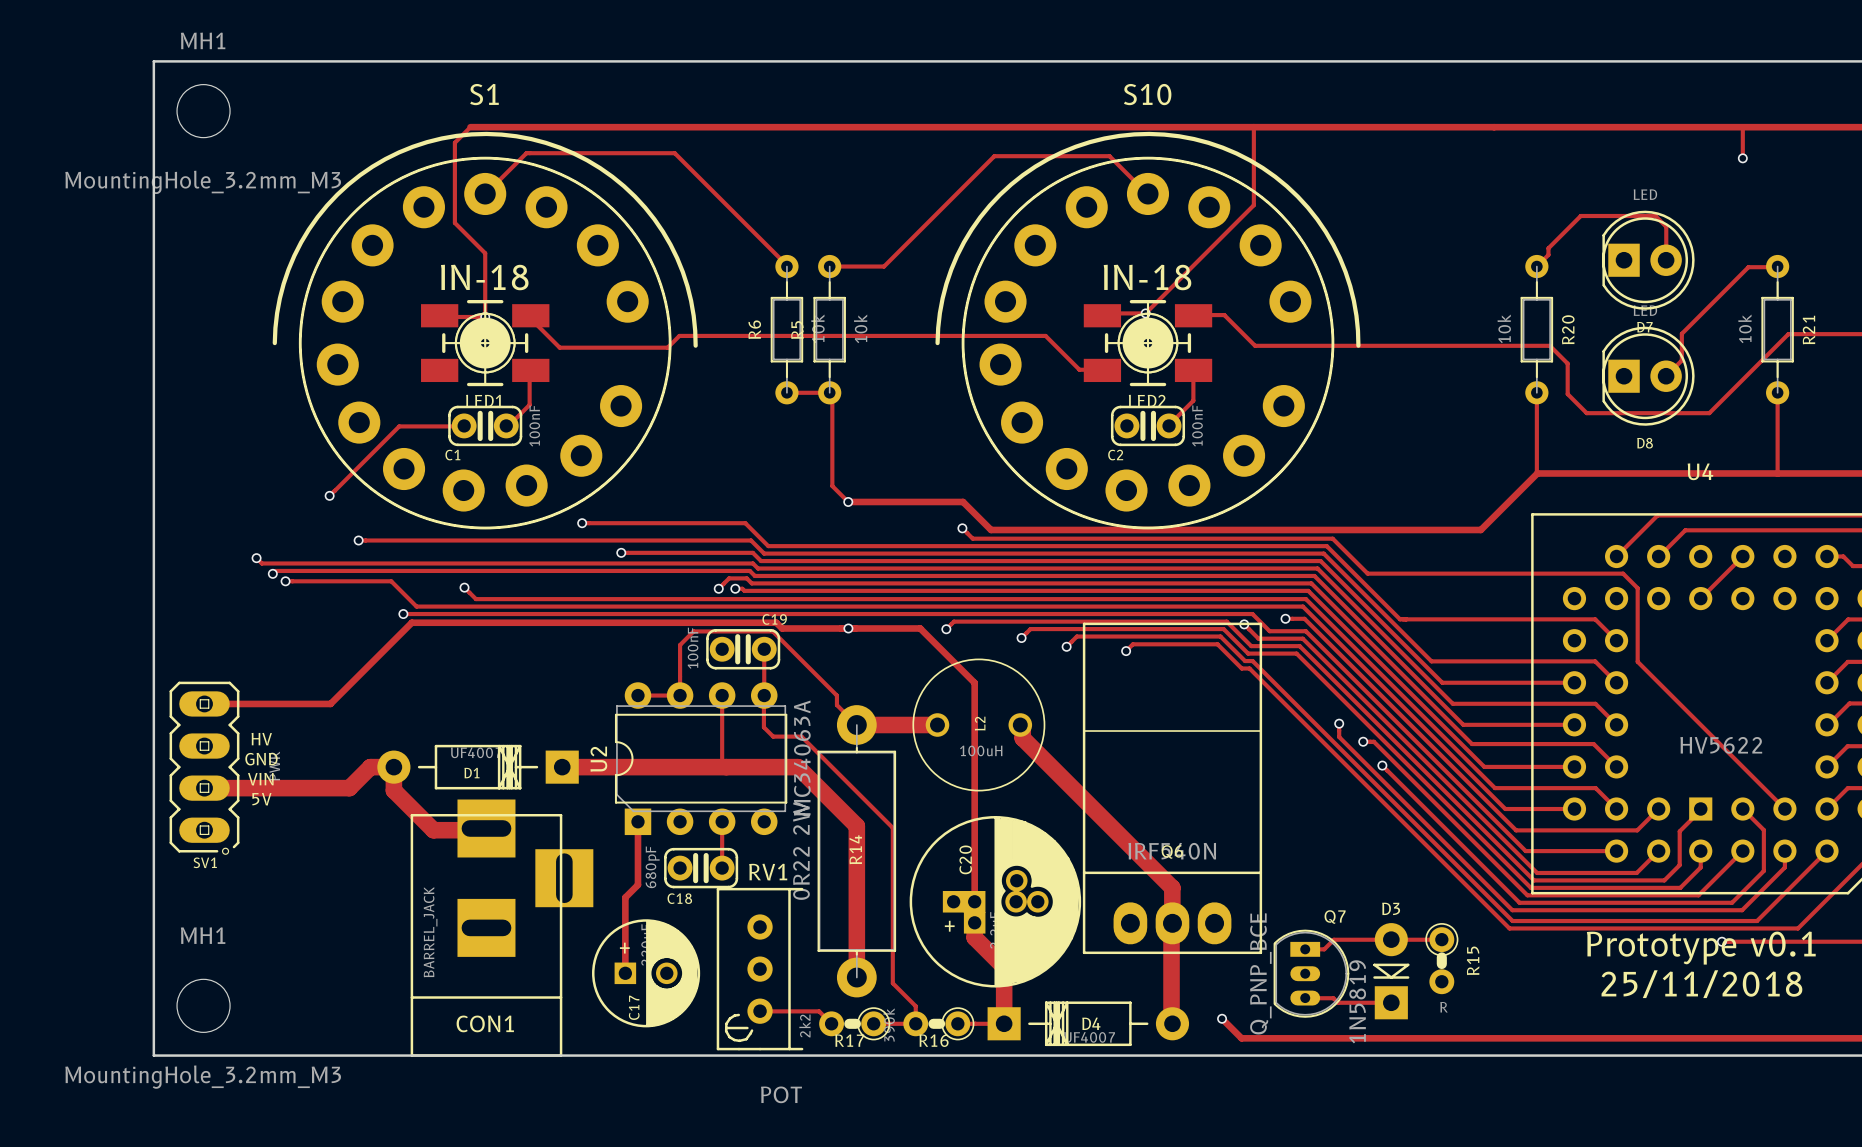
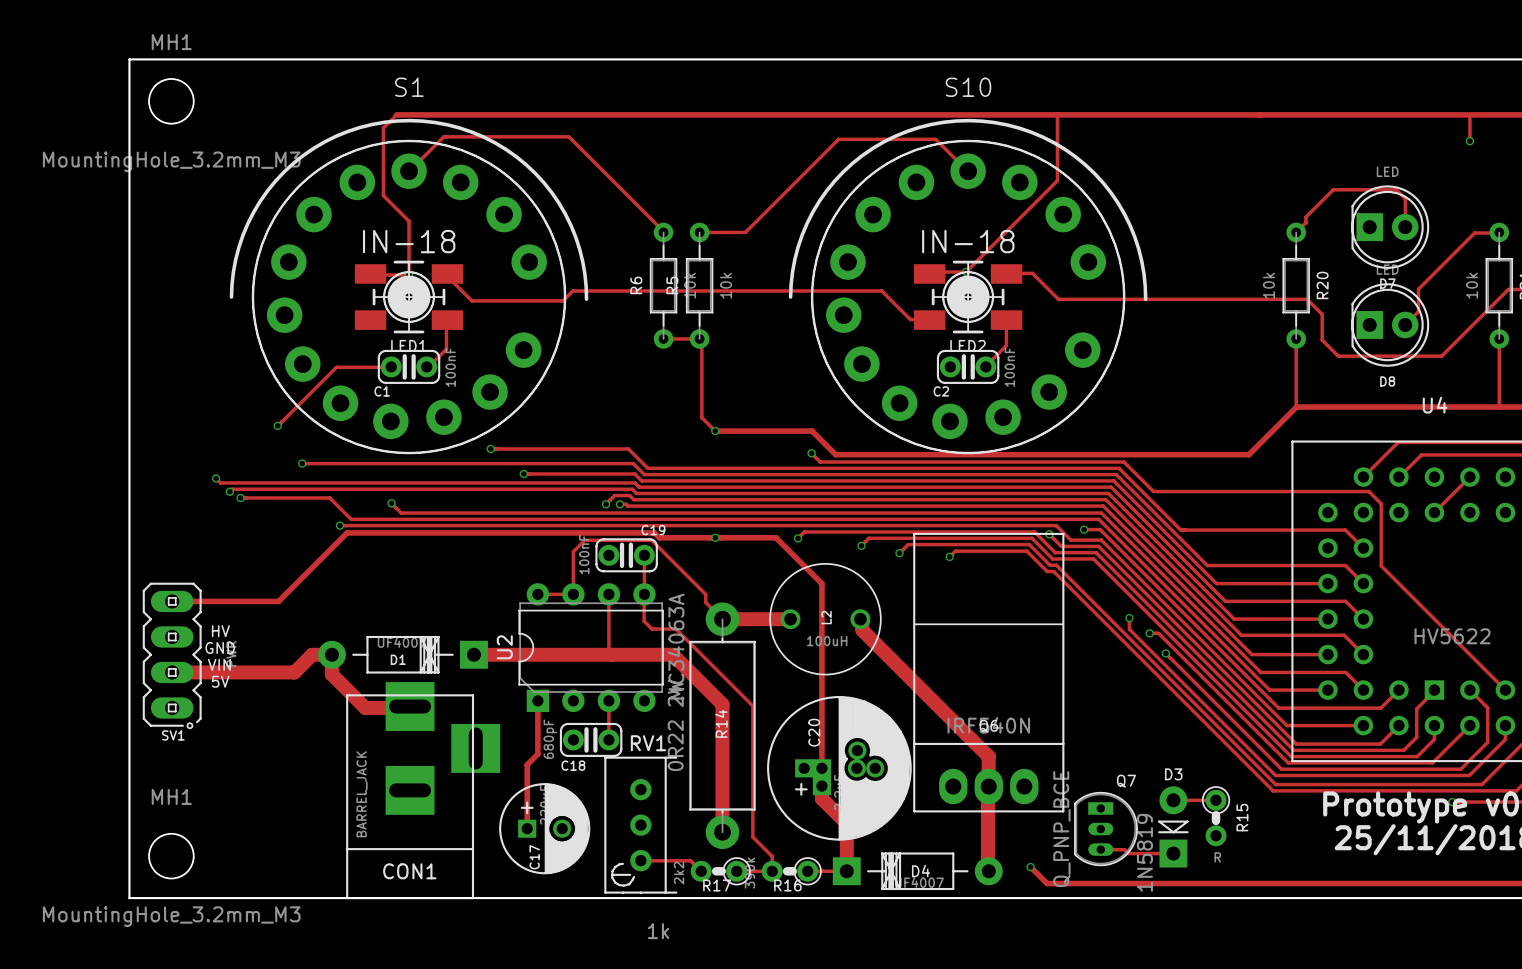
track: (1390, 939) (1333, 939) (1324, 949) (1305, 949) -> none
RV1 value: POT (781, 1094) -> 1k (658, 931)

